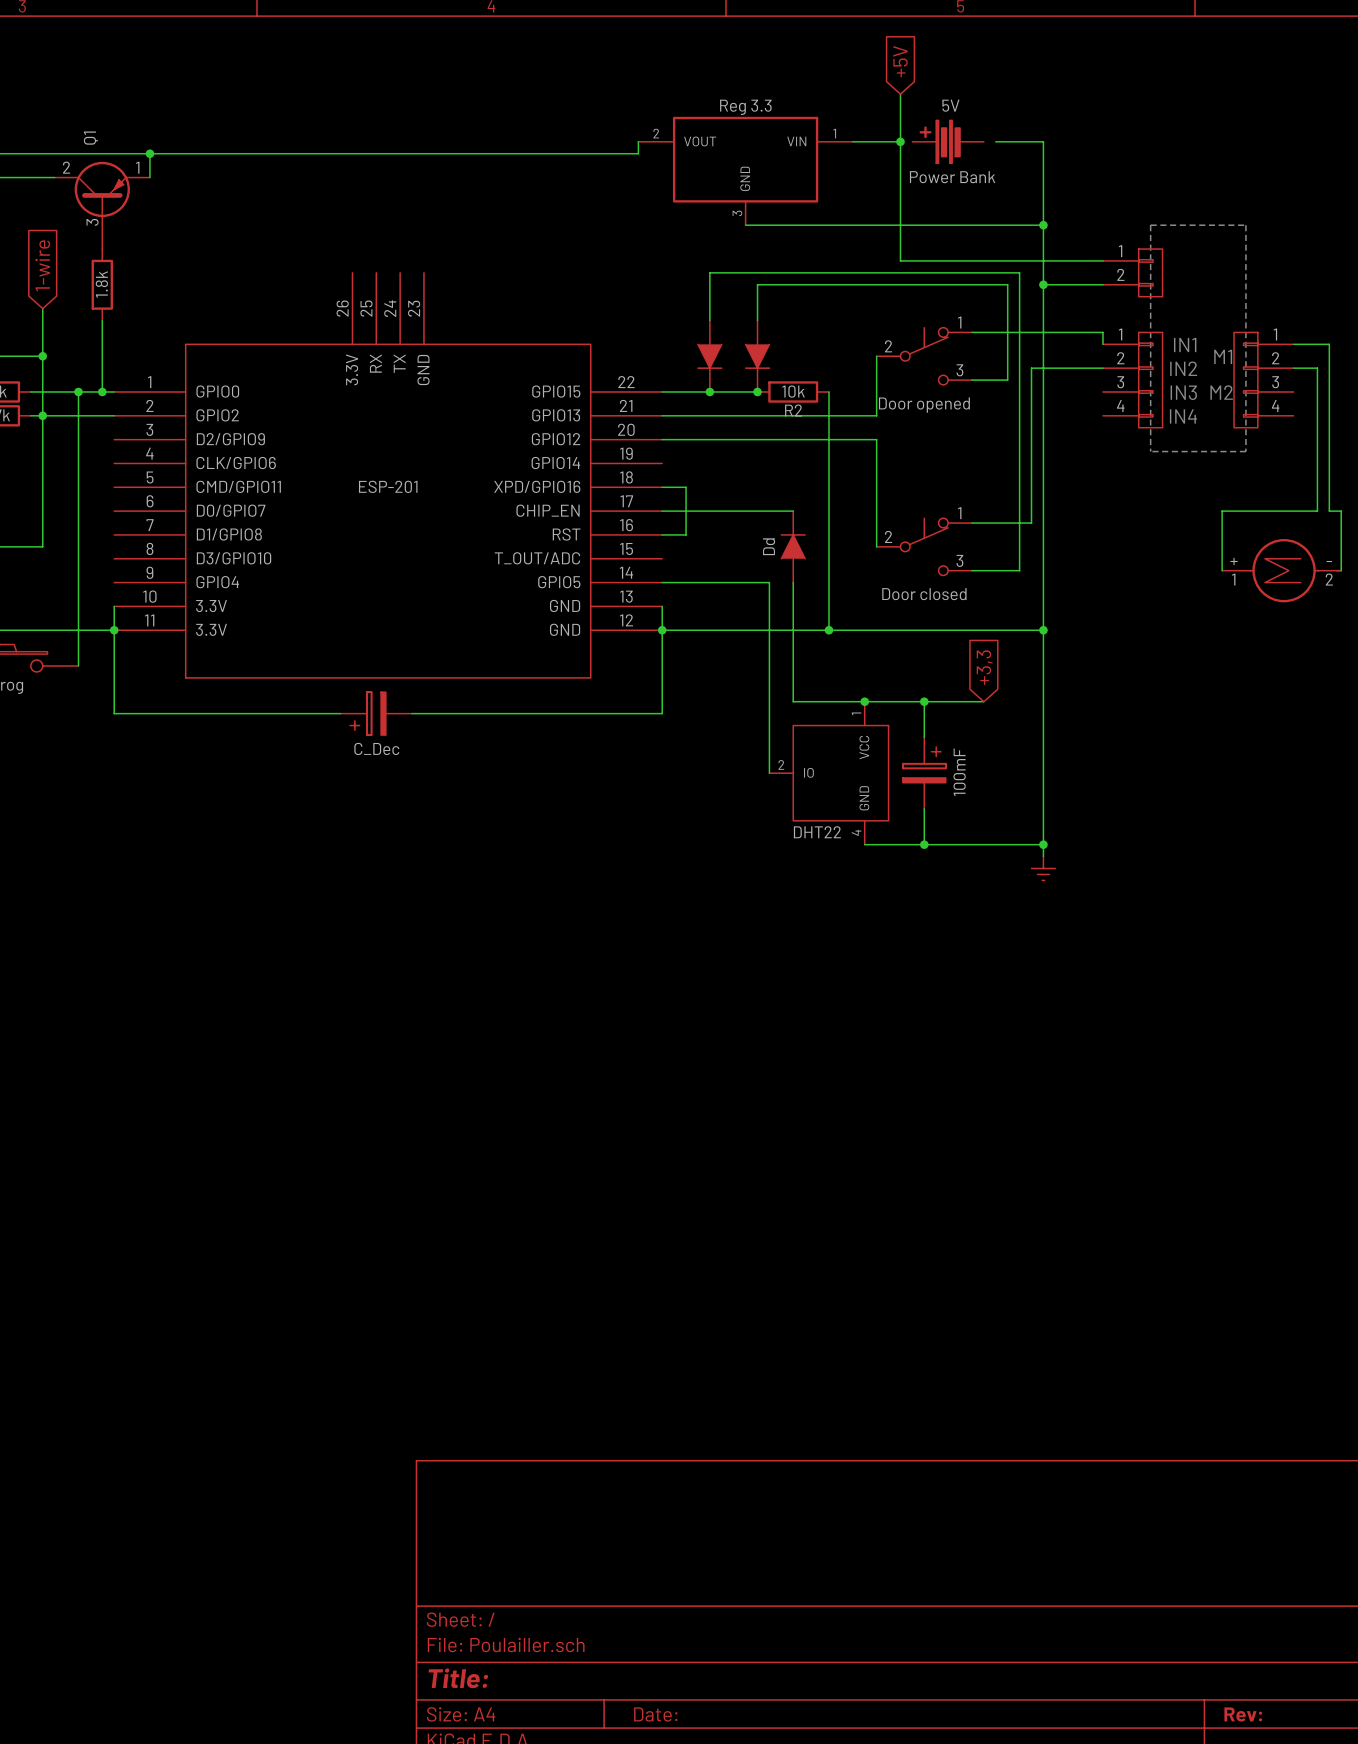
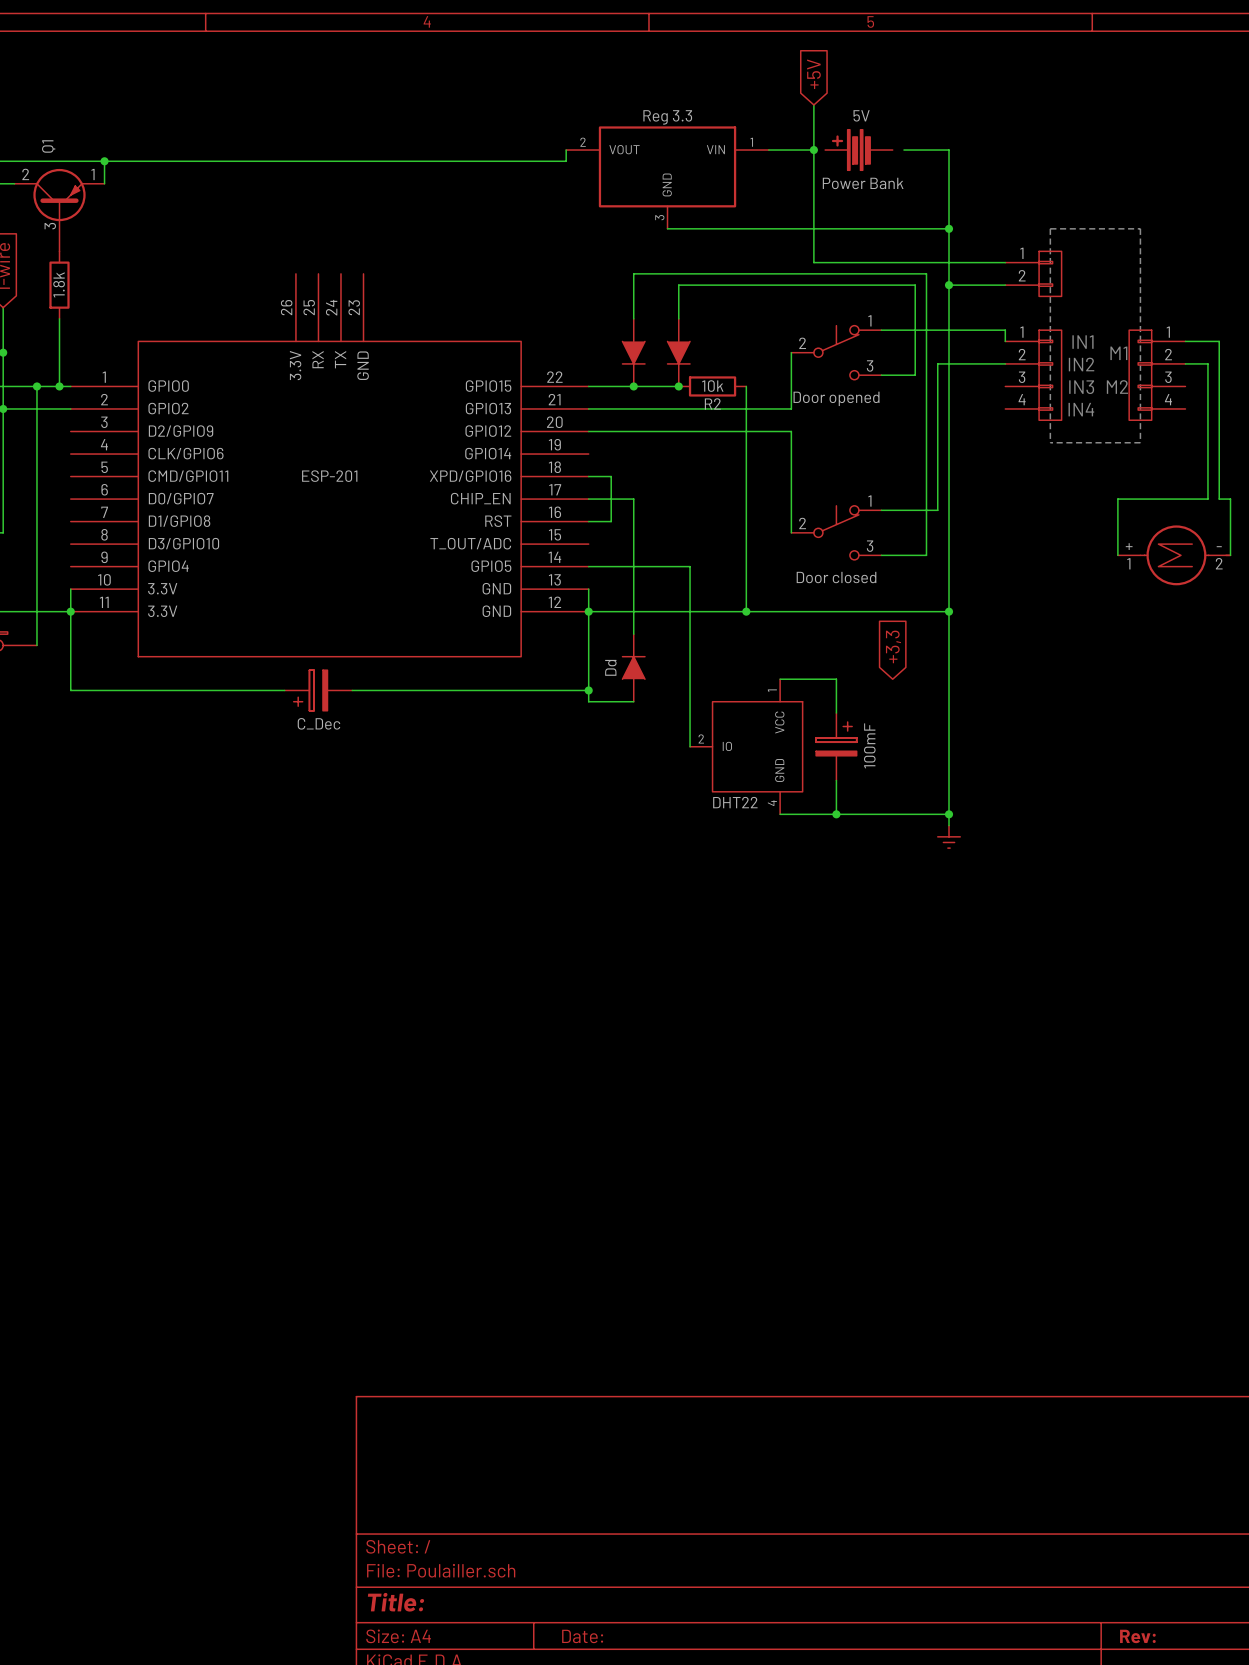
wire: (709, 511) (793, 511) -> (633, 499) (633, 634)
part position: (793, 546) -> (633, 667)
wire: (793, 582) (793, 701) (864, 701) -> none
junction: (864, 701) -> none
wire: (924, 701) (983, 701) -> none
junction: (924, 701) -> none
wire: none -> (588, 690) (588, 701) (633, 701)
junction: none -> (588, 690)

